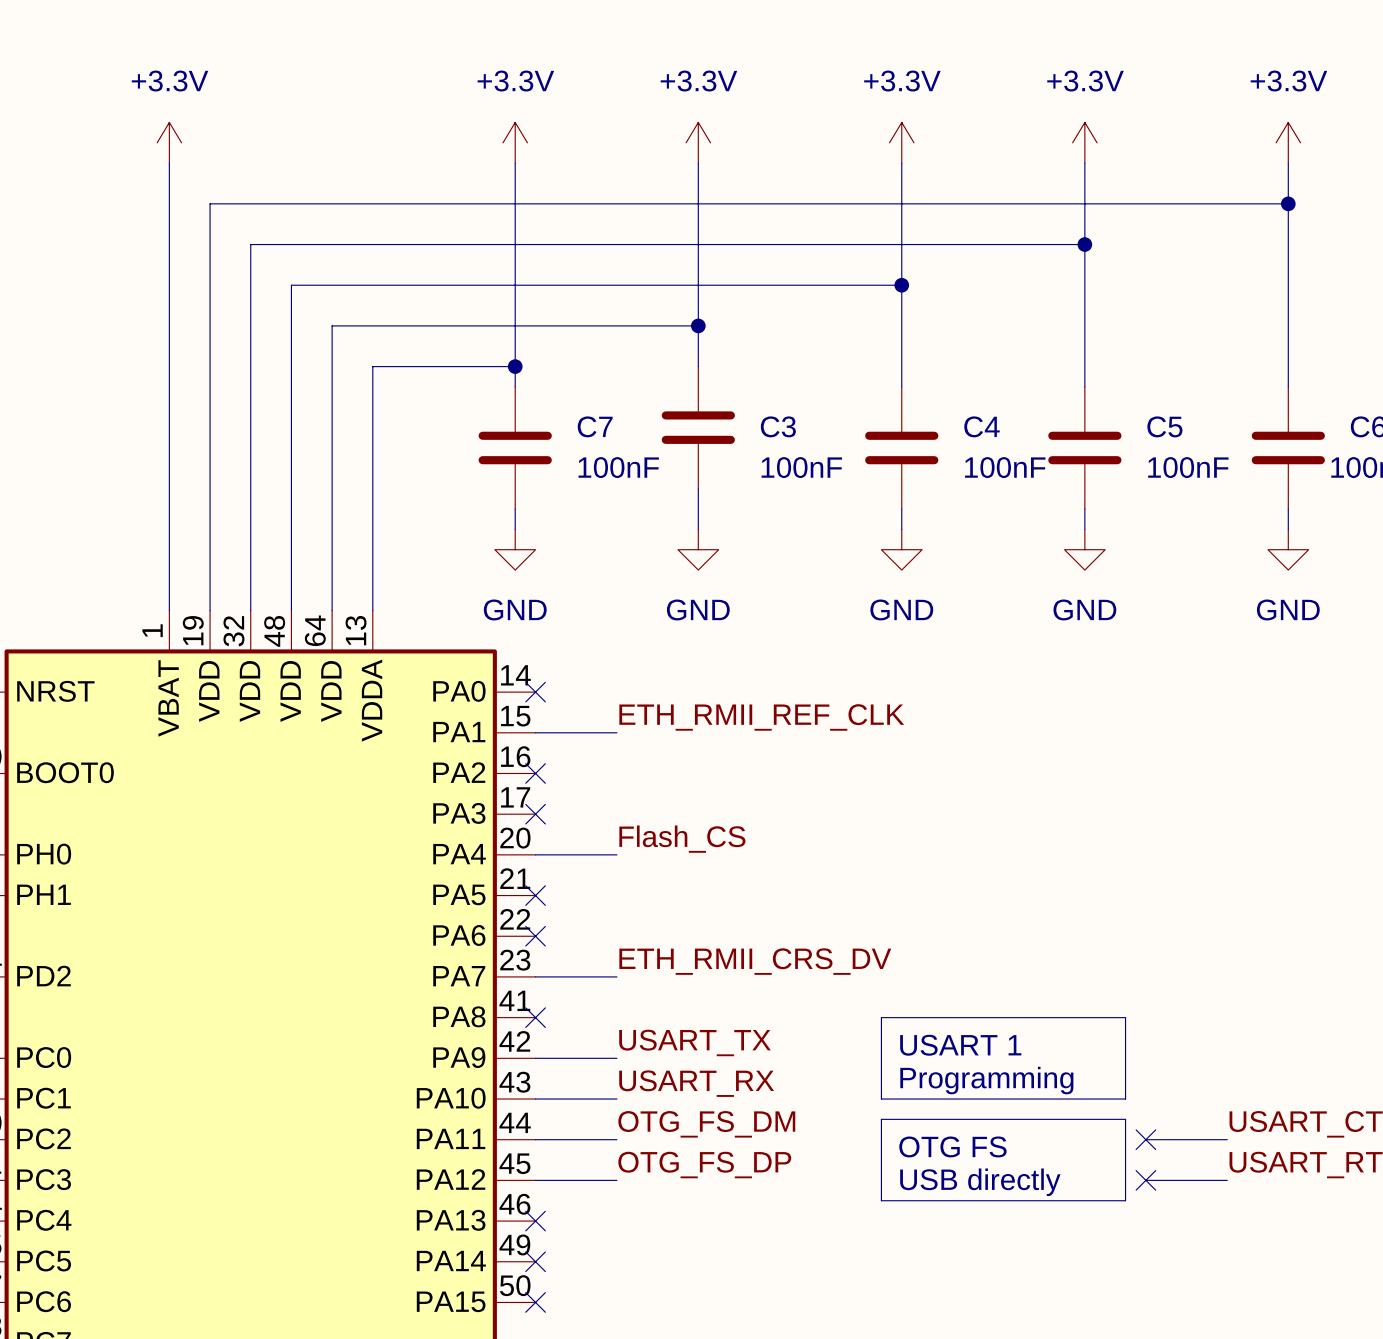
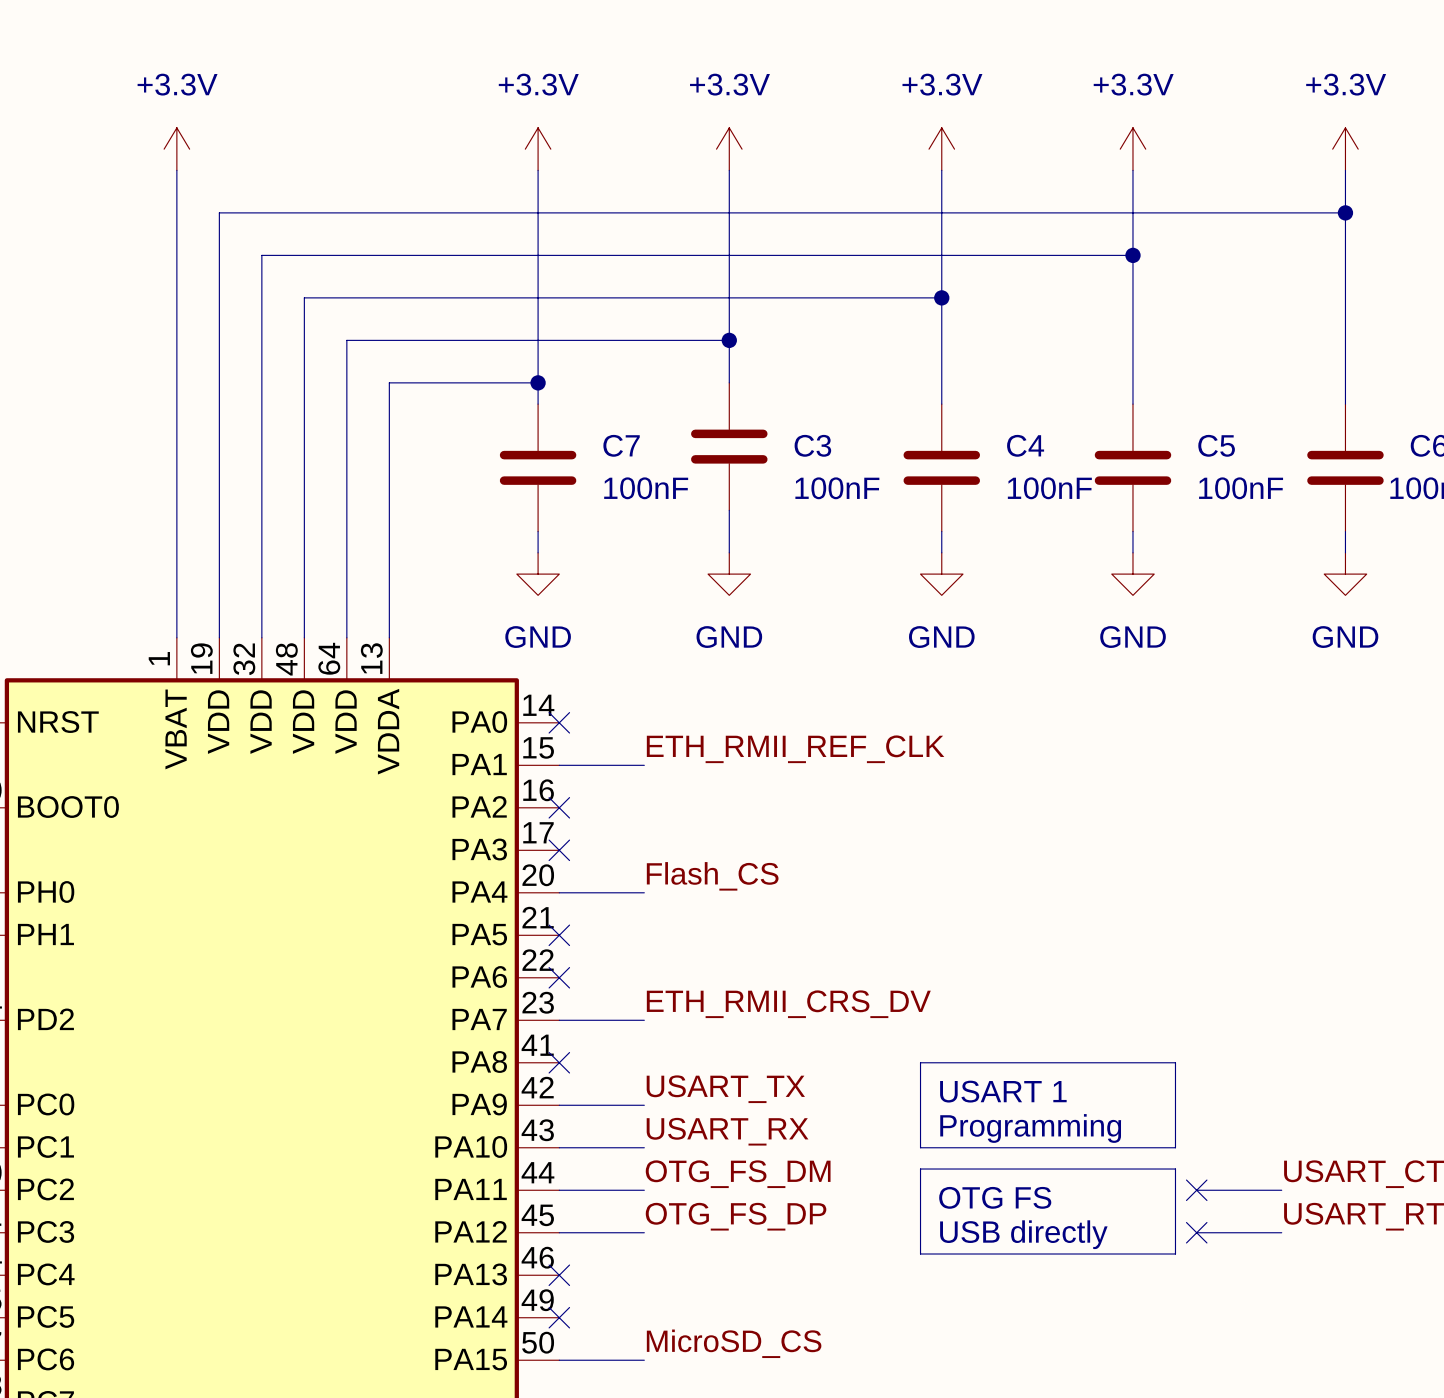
label: none -> MicroSD_CS (734, 1343)
wire: none -> (559, 1360) (644, 1360)
no-connect mark: (535, 1302) -> none

